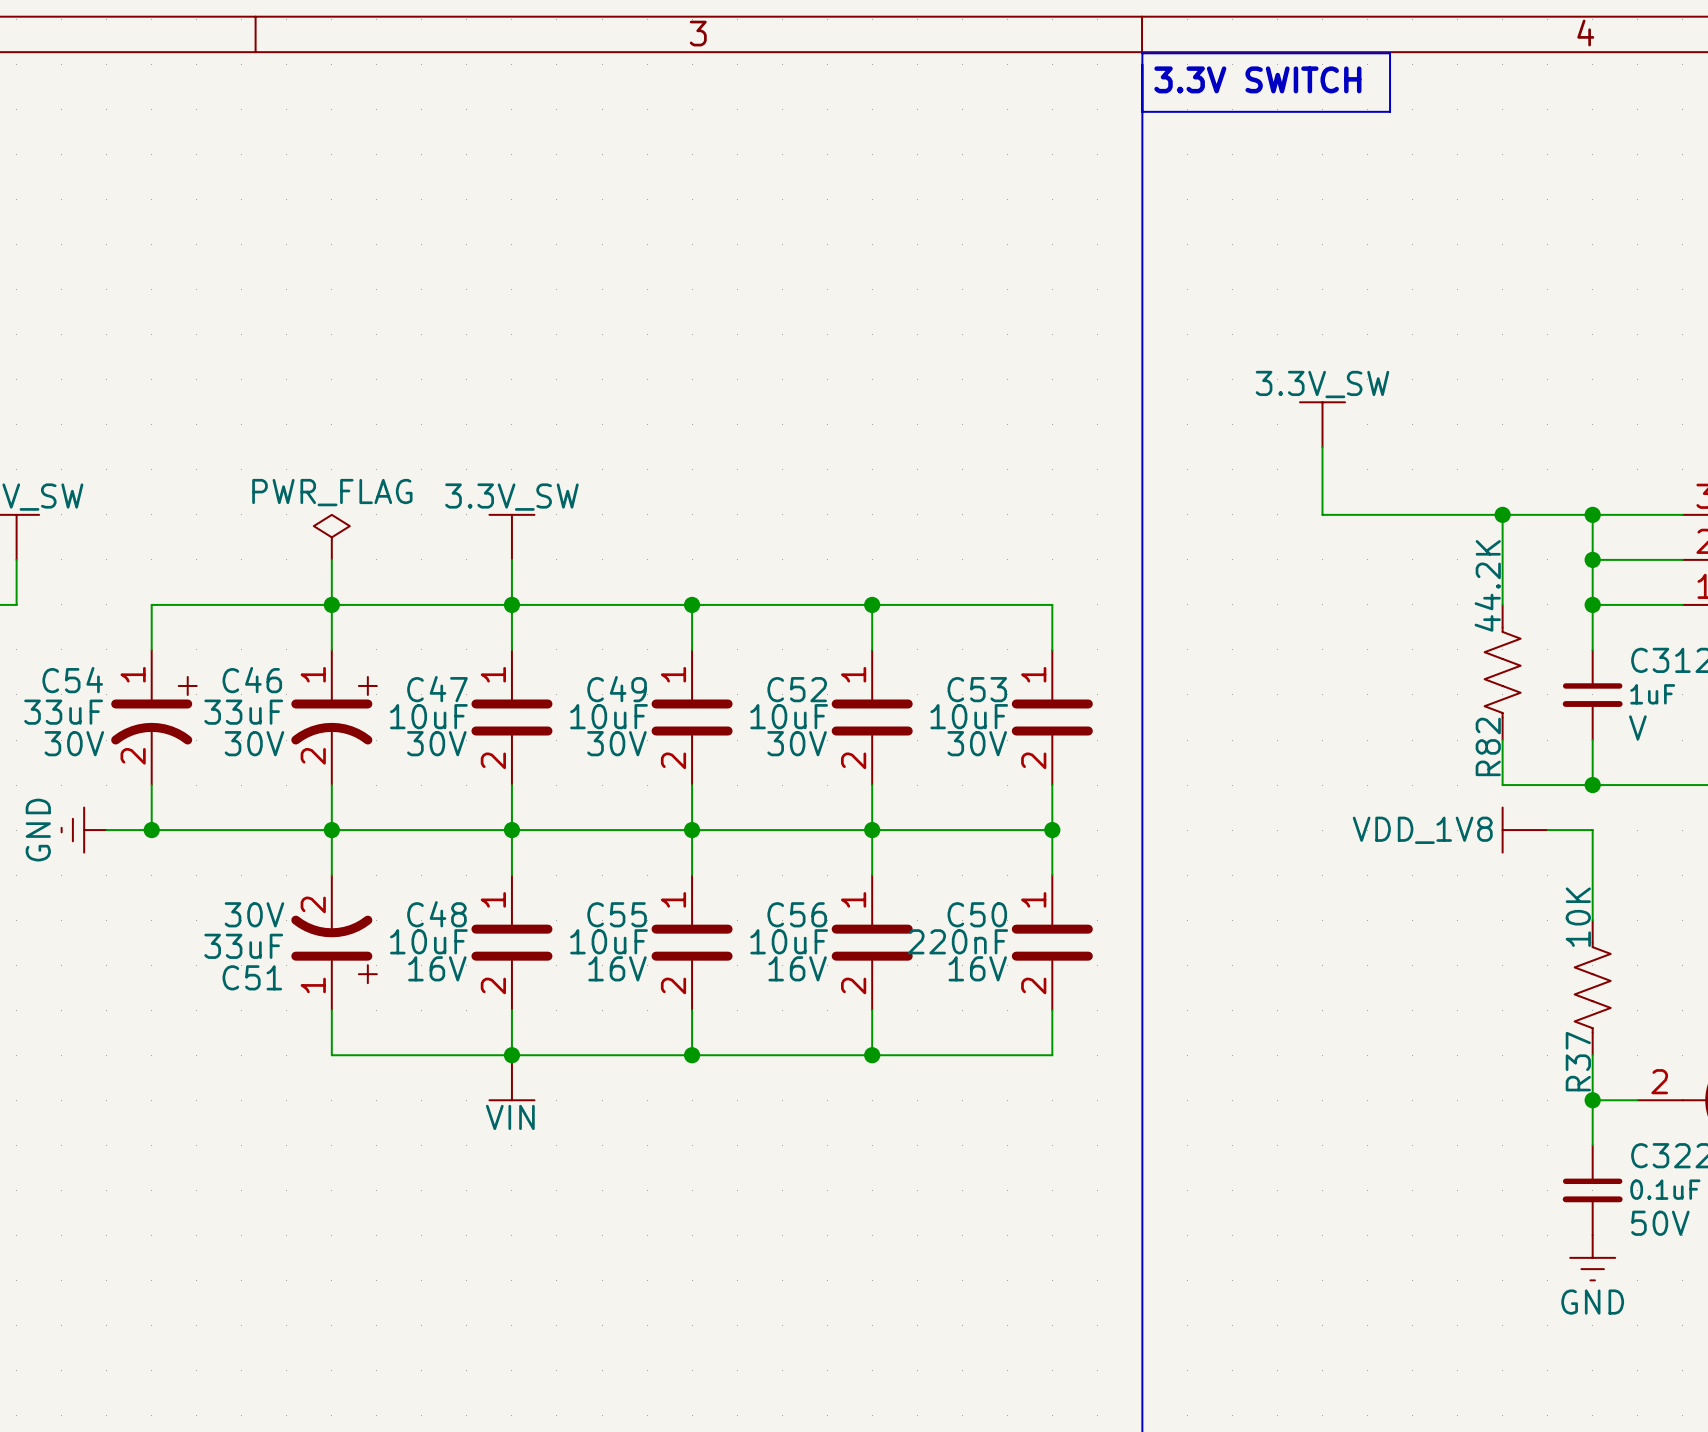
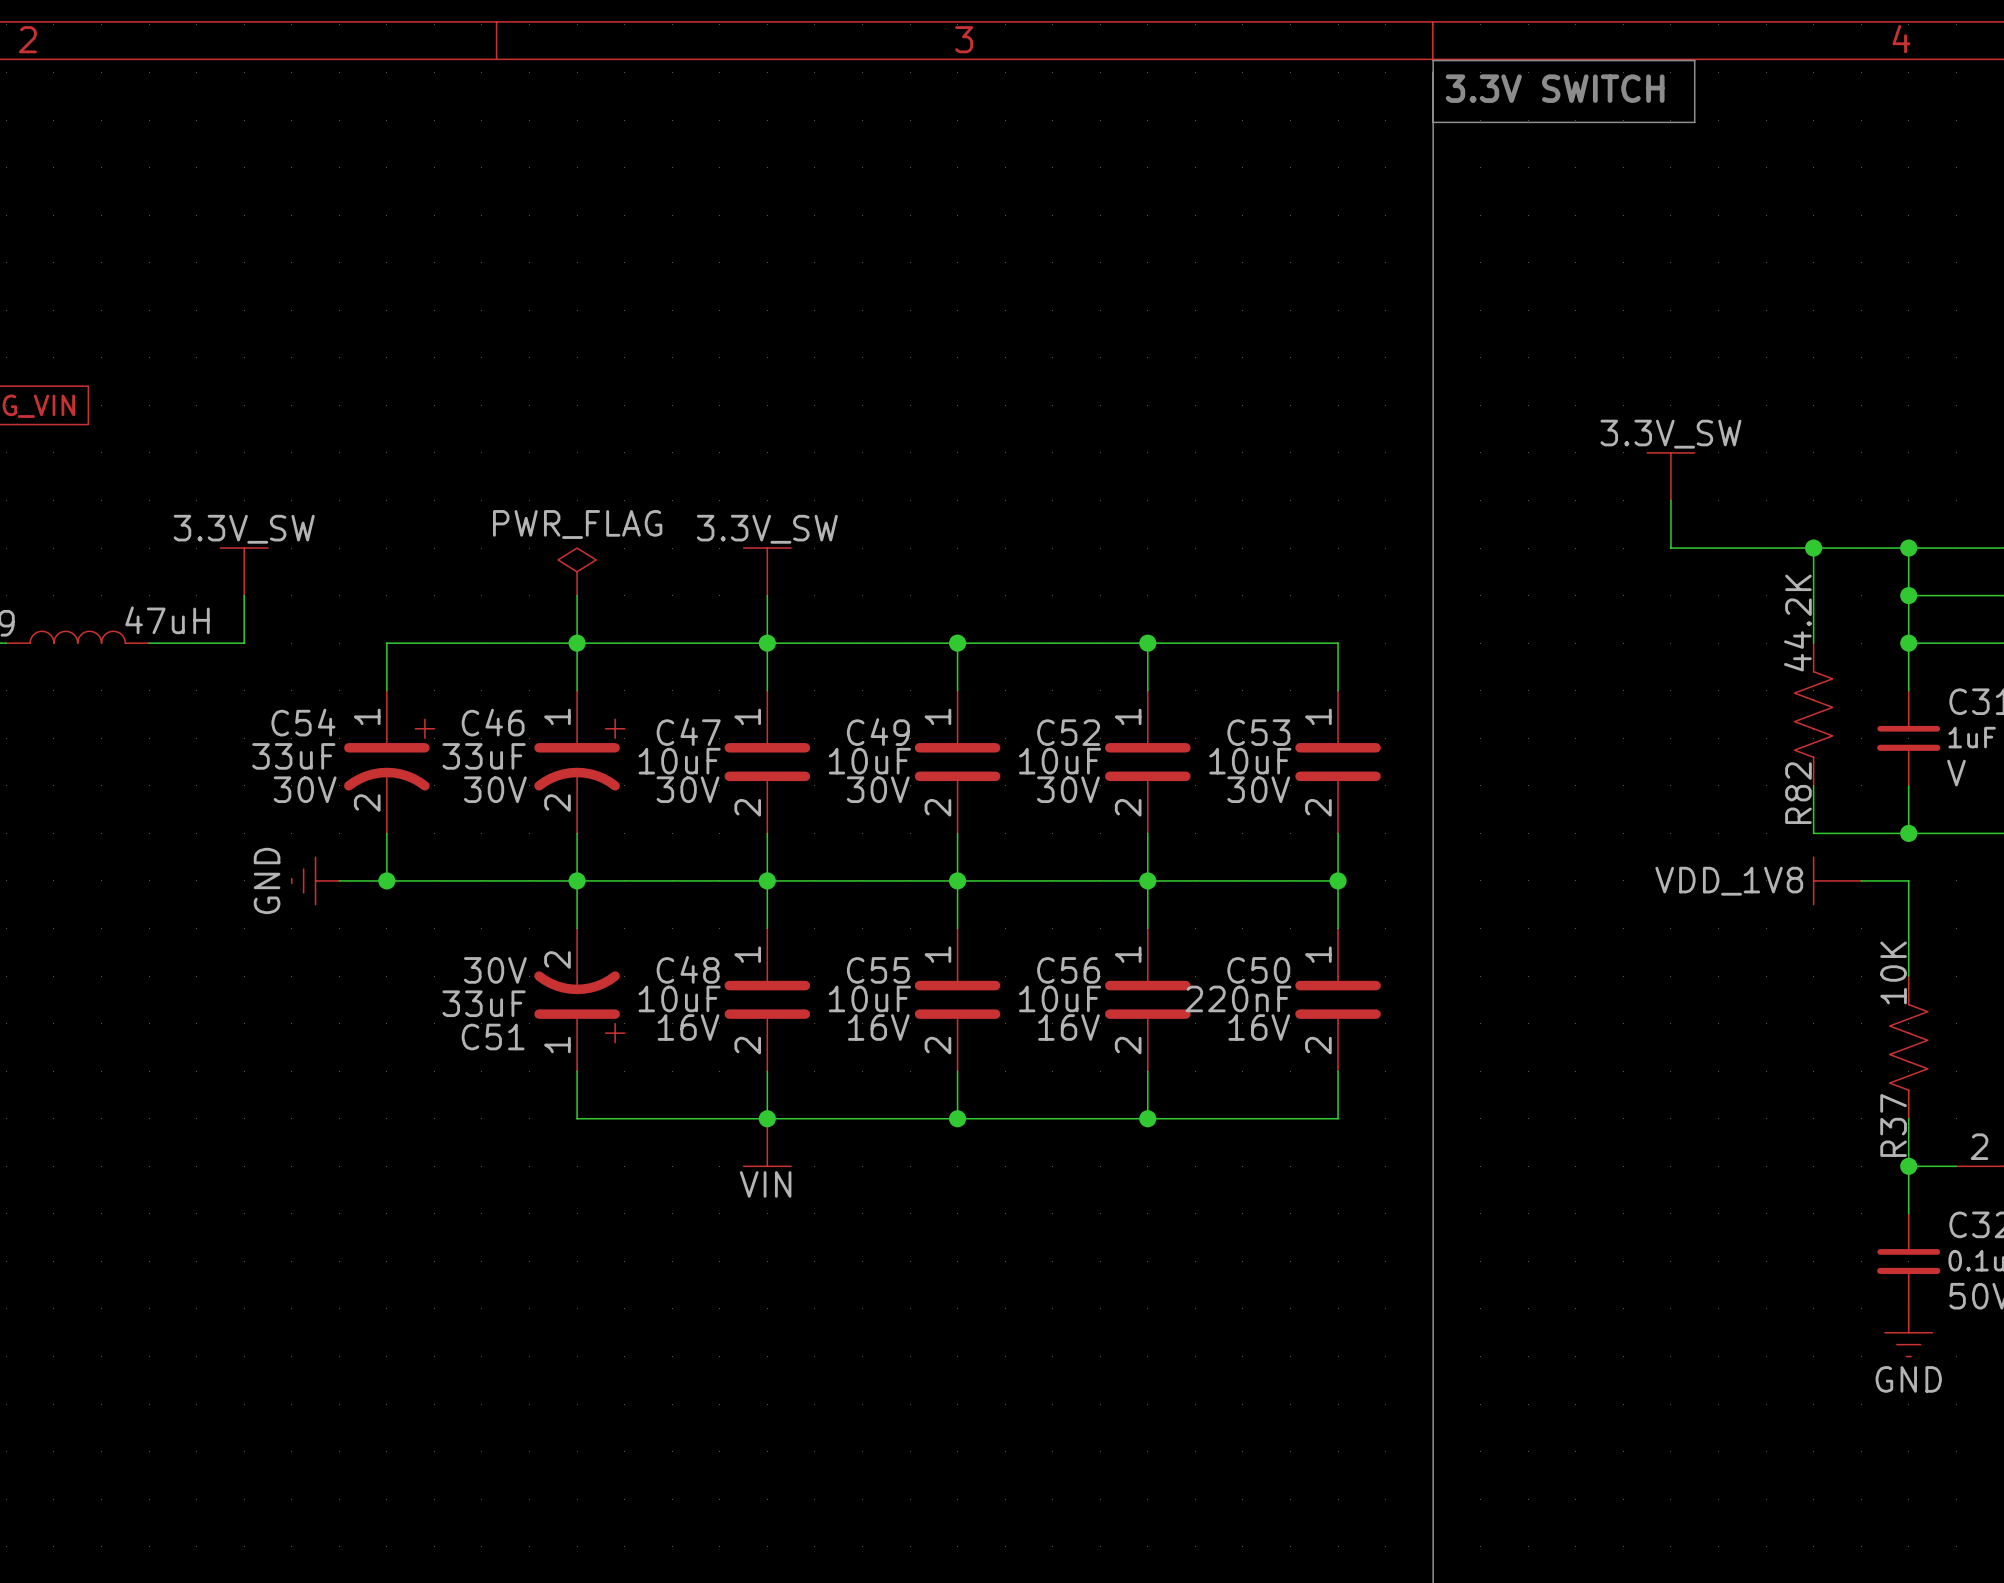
power symbol position: 3.3V_SW (1322, 424) -> 3.3V_SW (1670, 476)
wire: (1322, 447) (1322, 514) (1367, 514) -> (1670, 500) (1670, 548)

